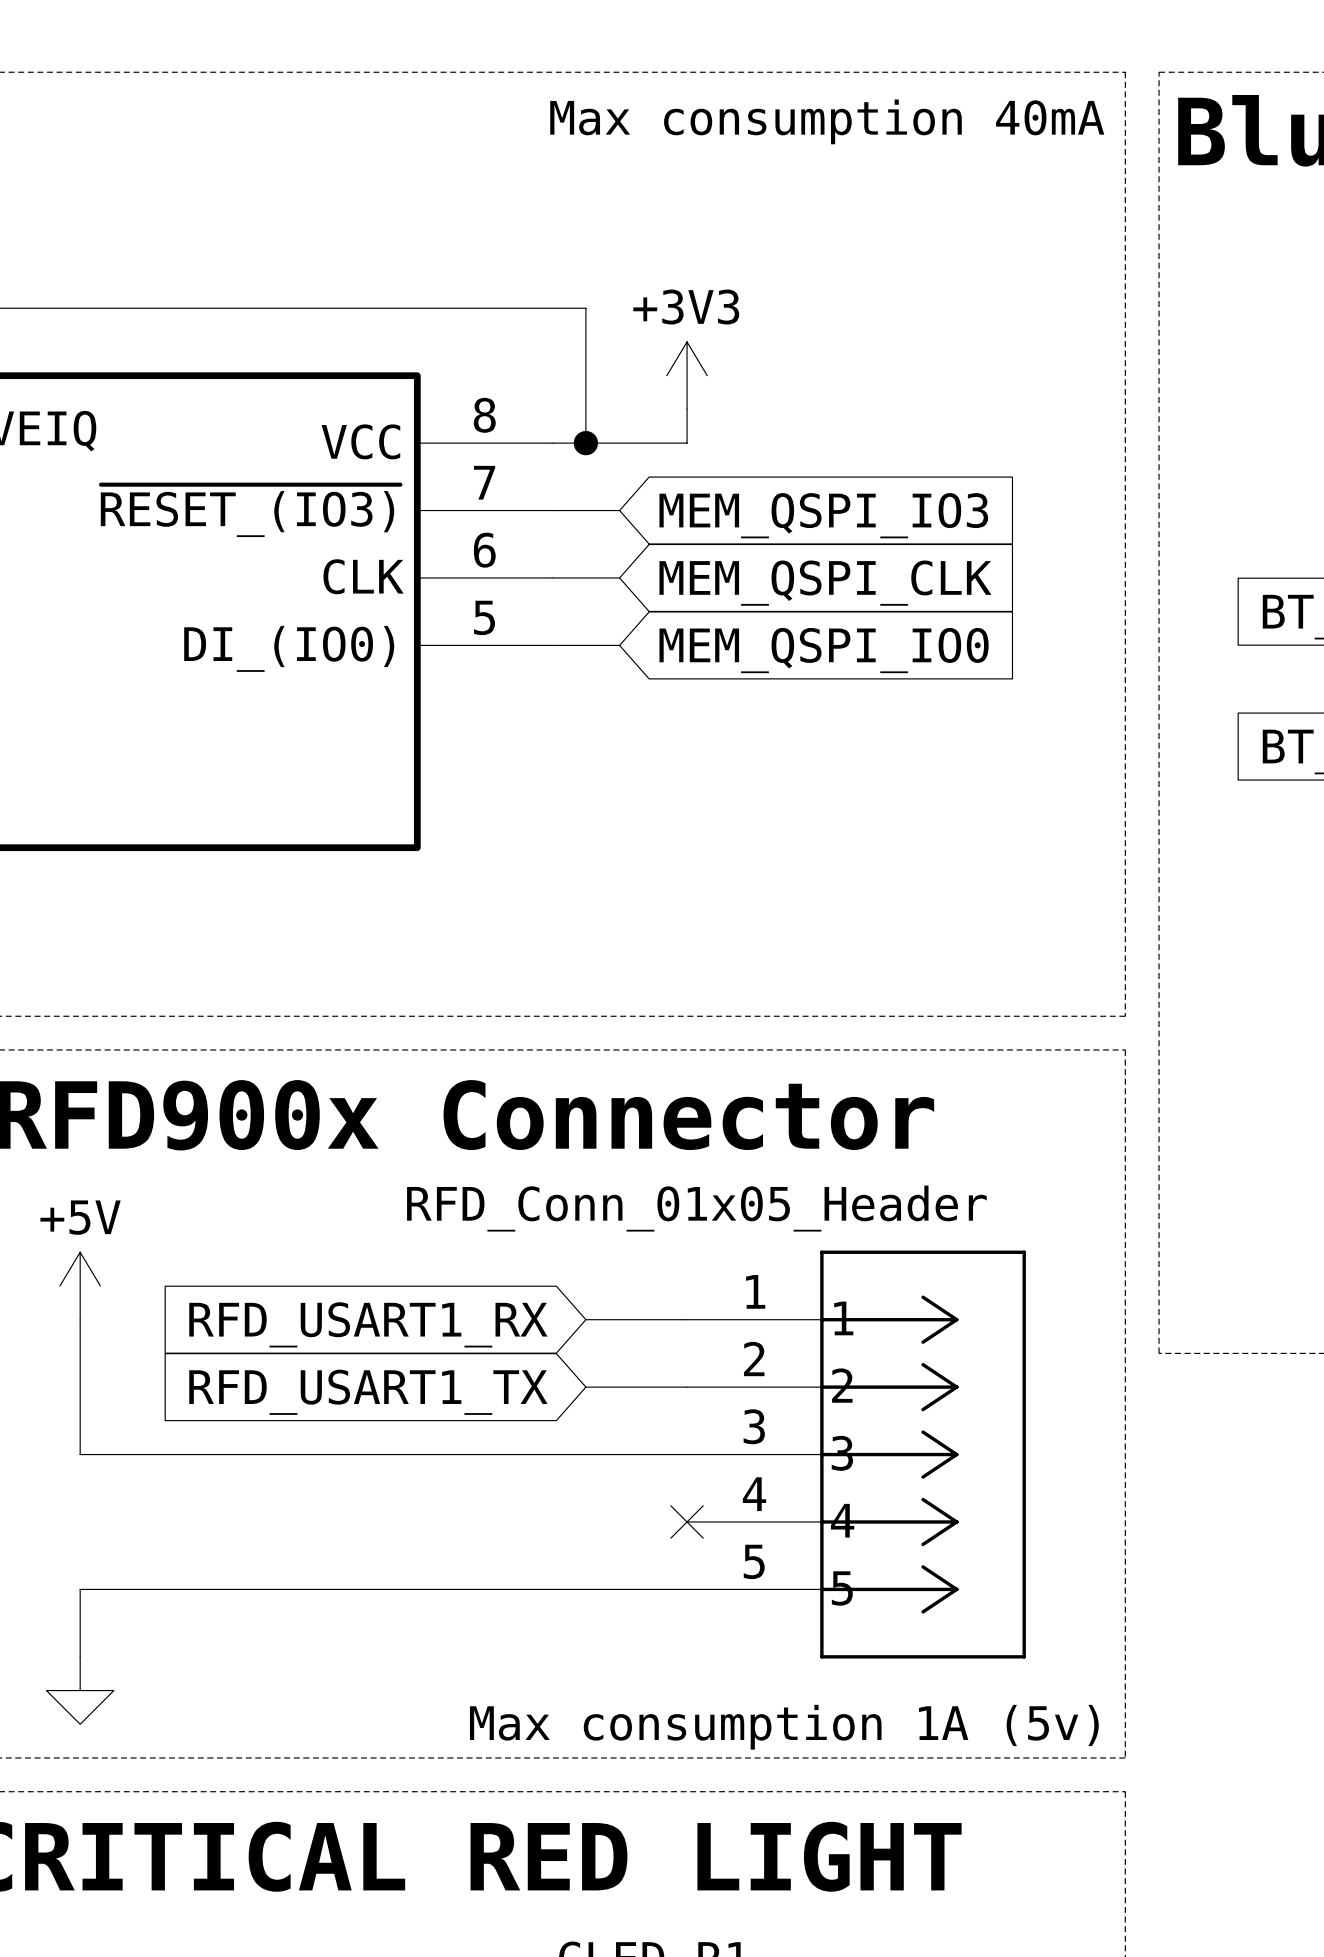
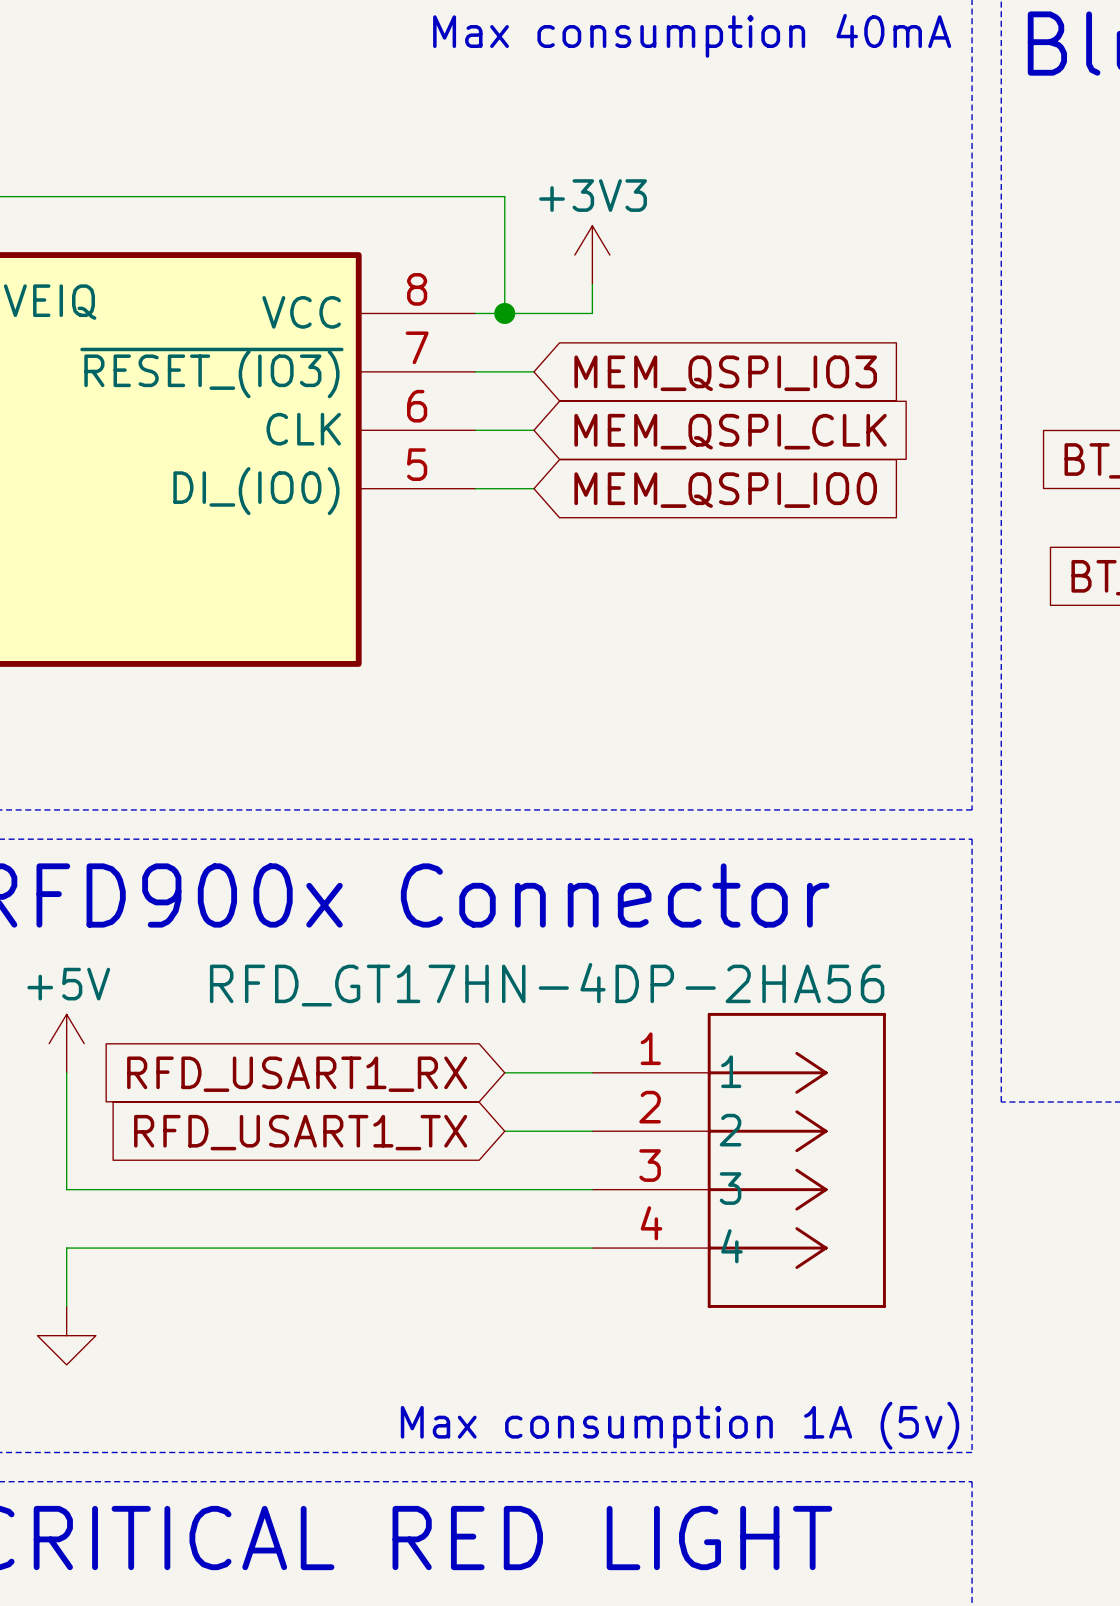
part: none -> RFD_GT17HN-4DP-2HA56 (739, 1160)
part: RFD_Conn_01x05_Header (856, 1454) -> none
no-connect mark: (687, 1521) -> none
wire: (687, 1589) (80, 1589) (80, 1656) -> (592, 1248) (66, 1248) (66, 1306)
power symbol position: (80, 1690) -> (66, 1335)

